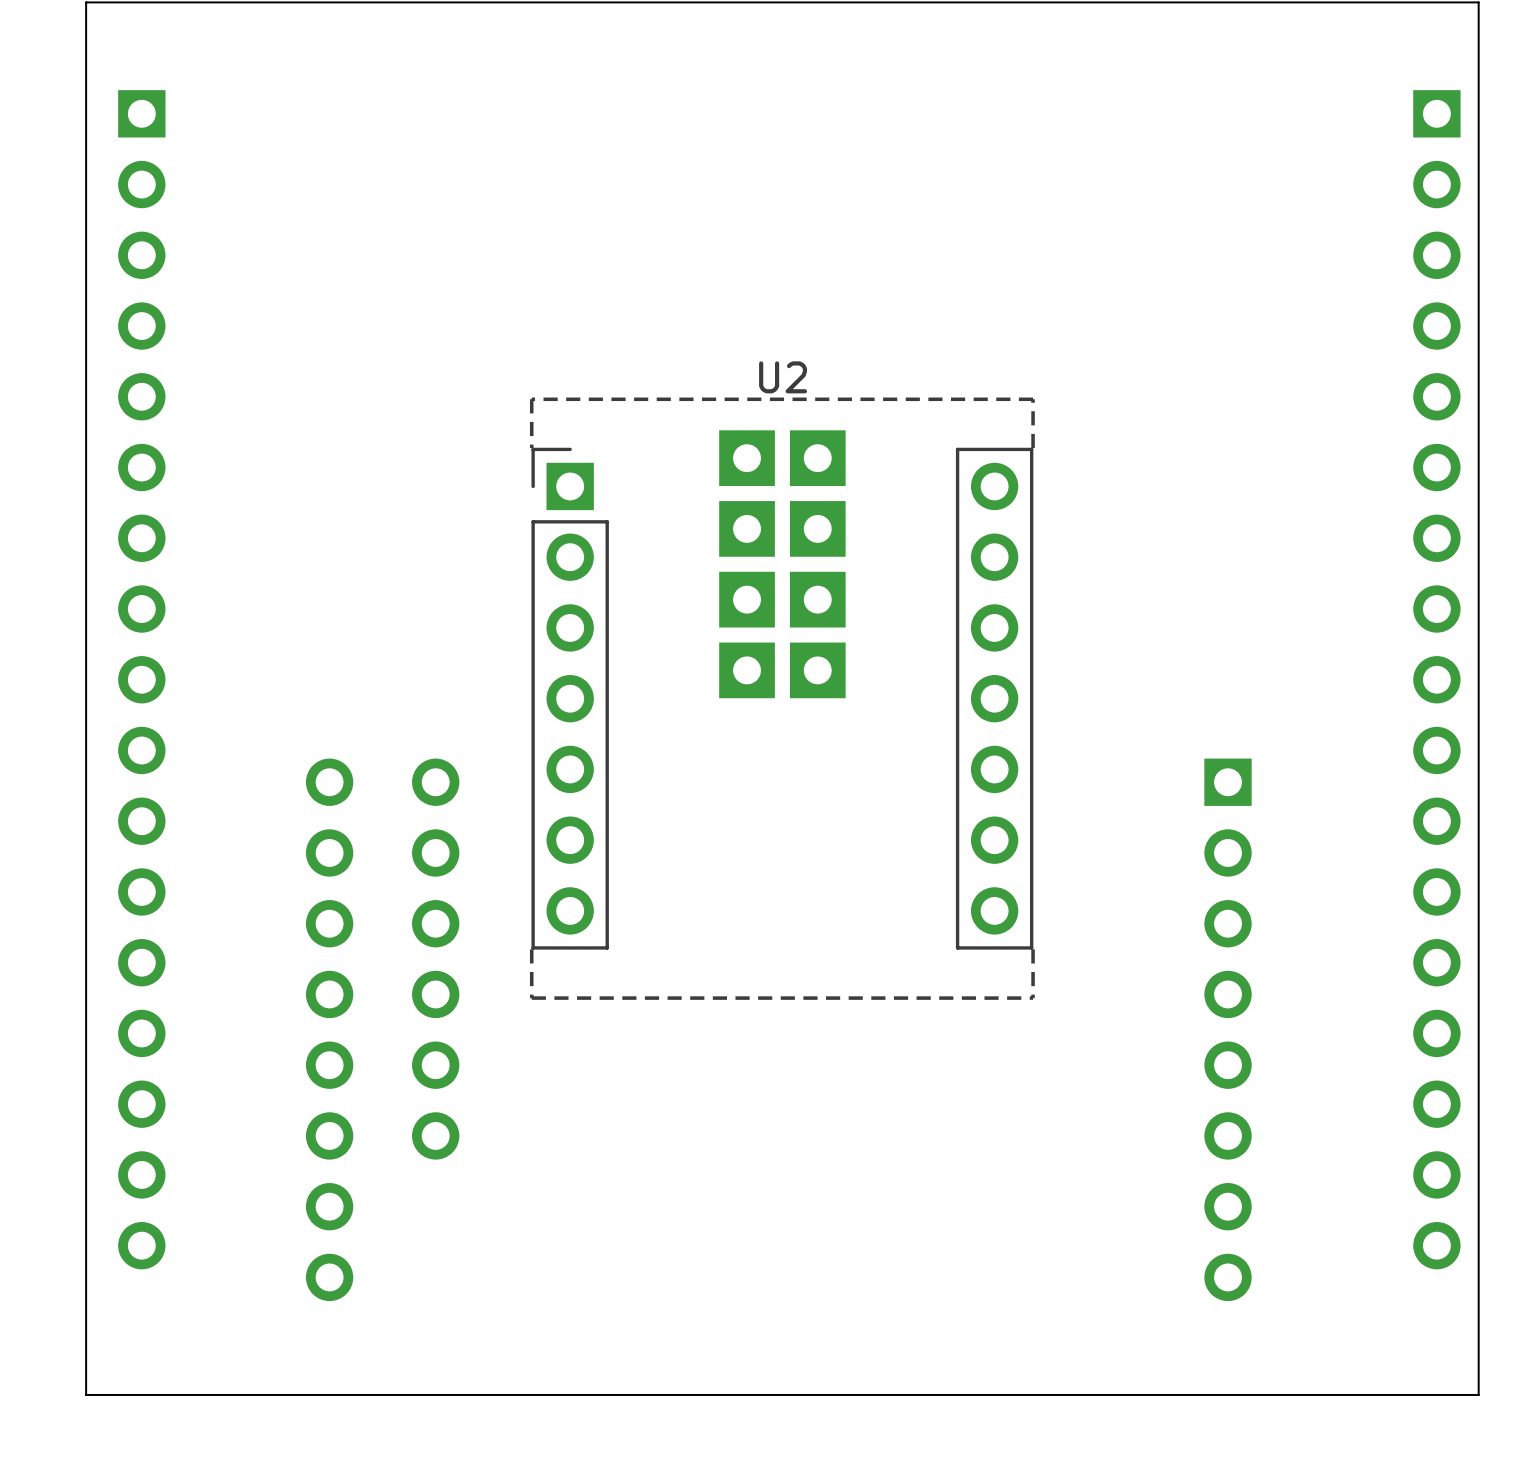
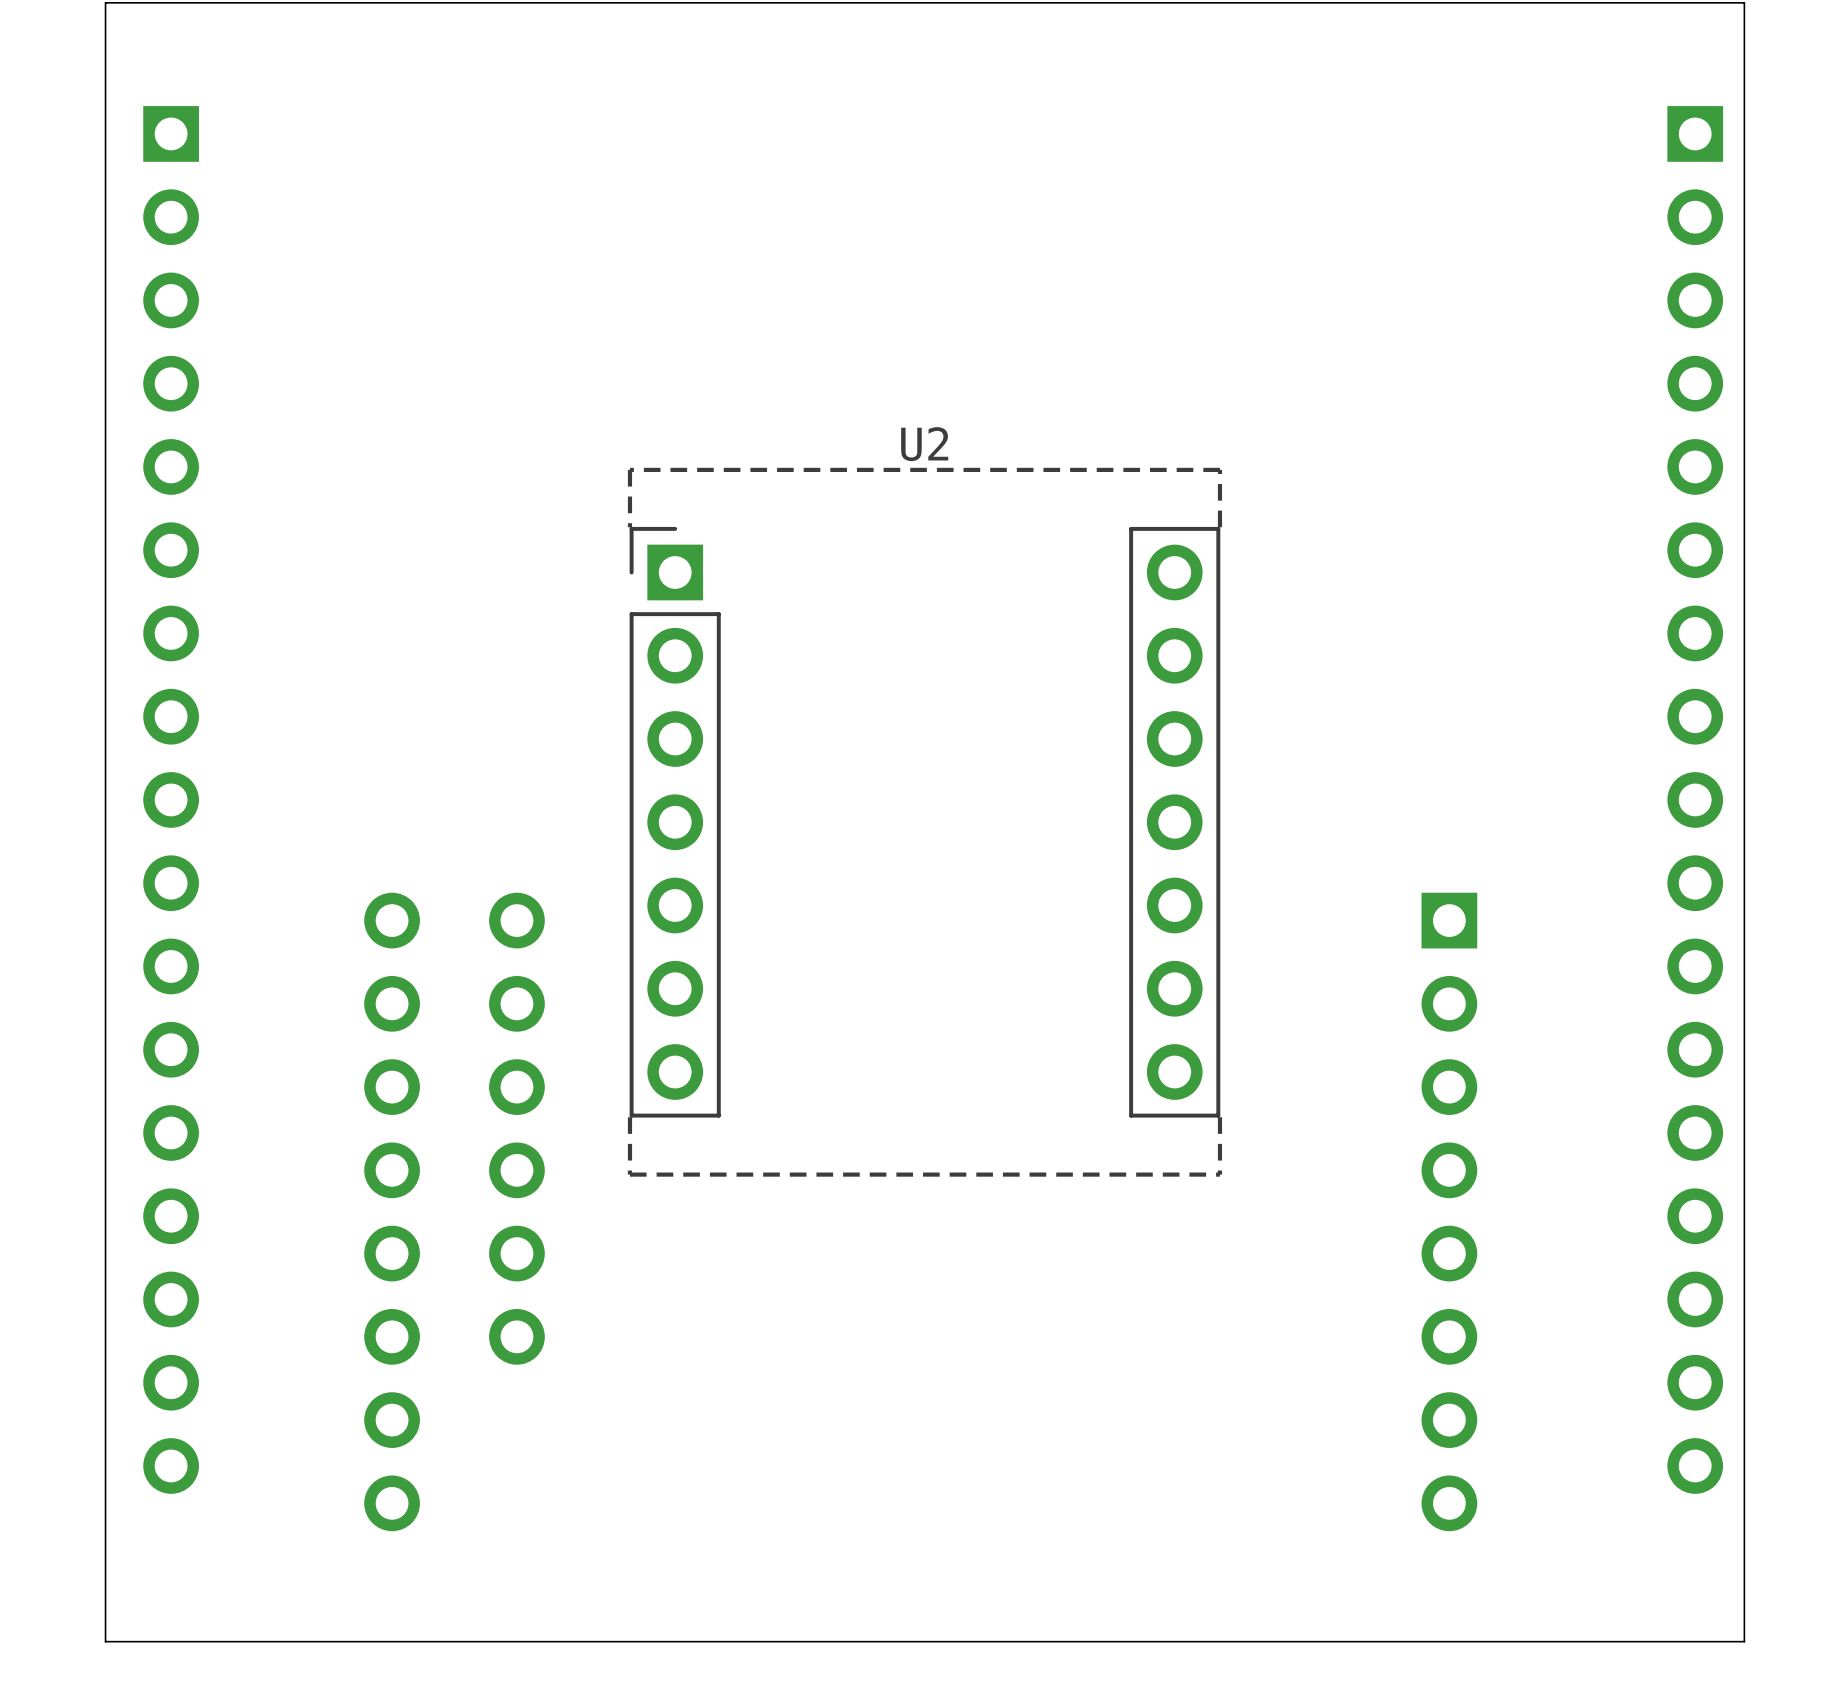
U2 footprint: [529, 397, 1035, 1000] -> [627, 467, 1223, 1177]

